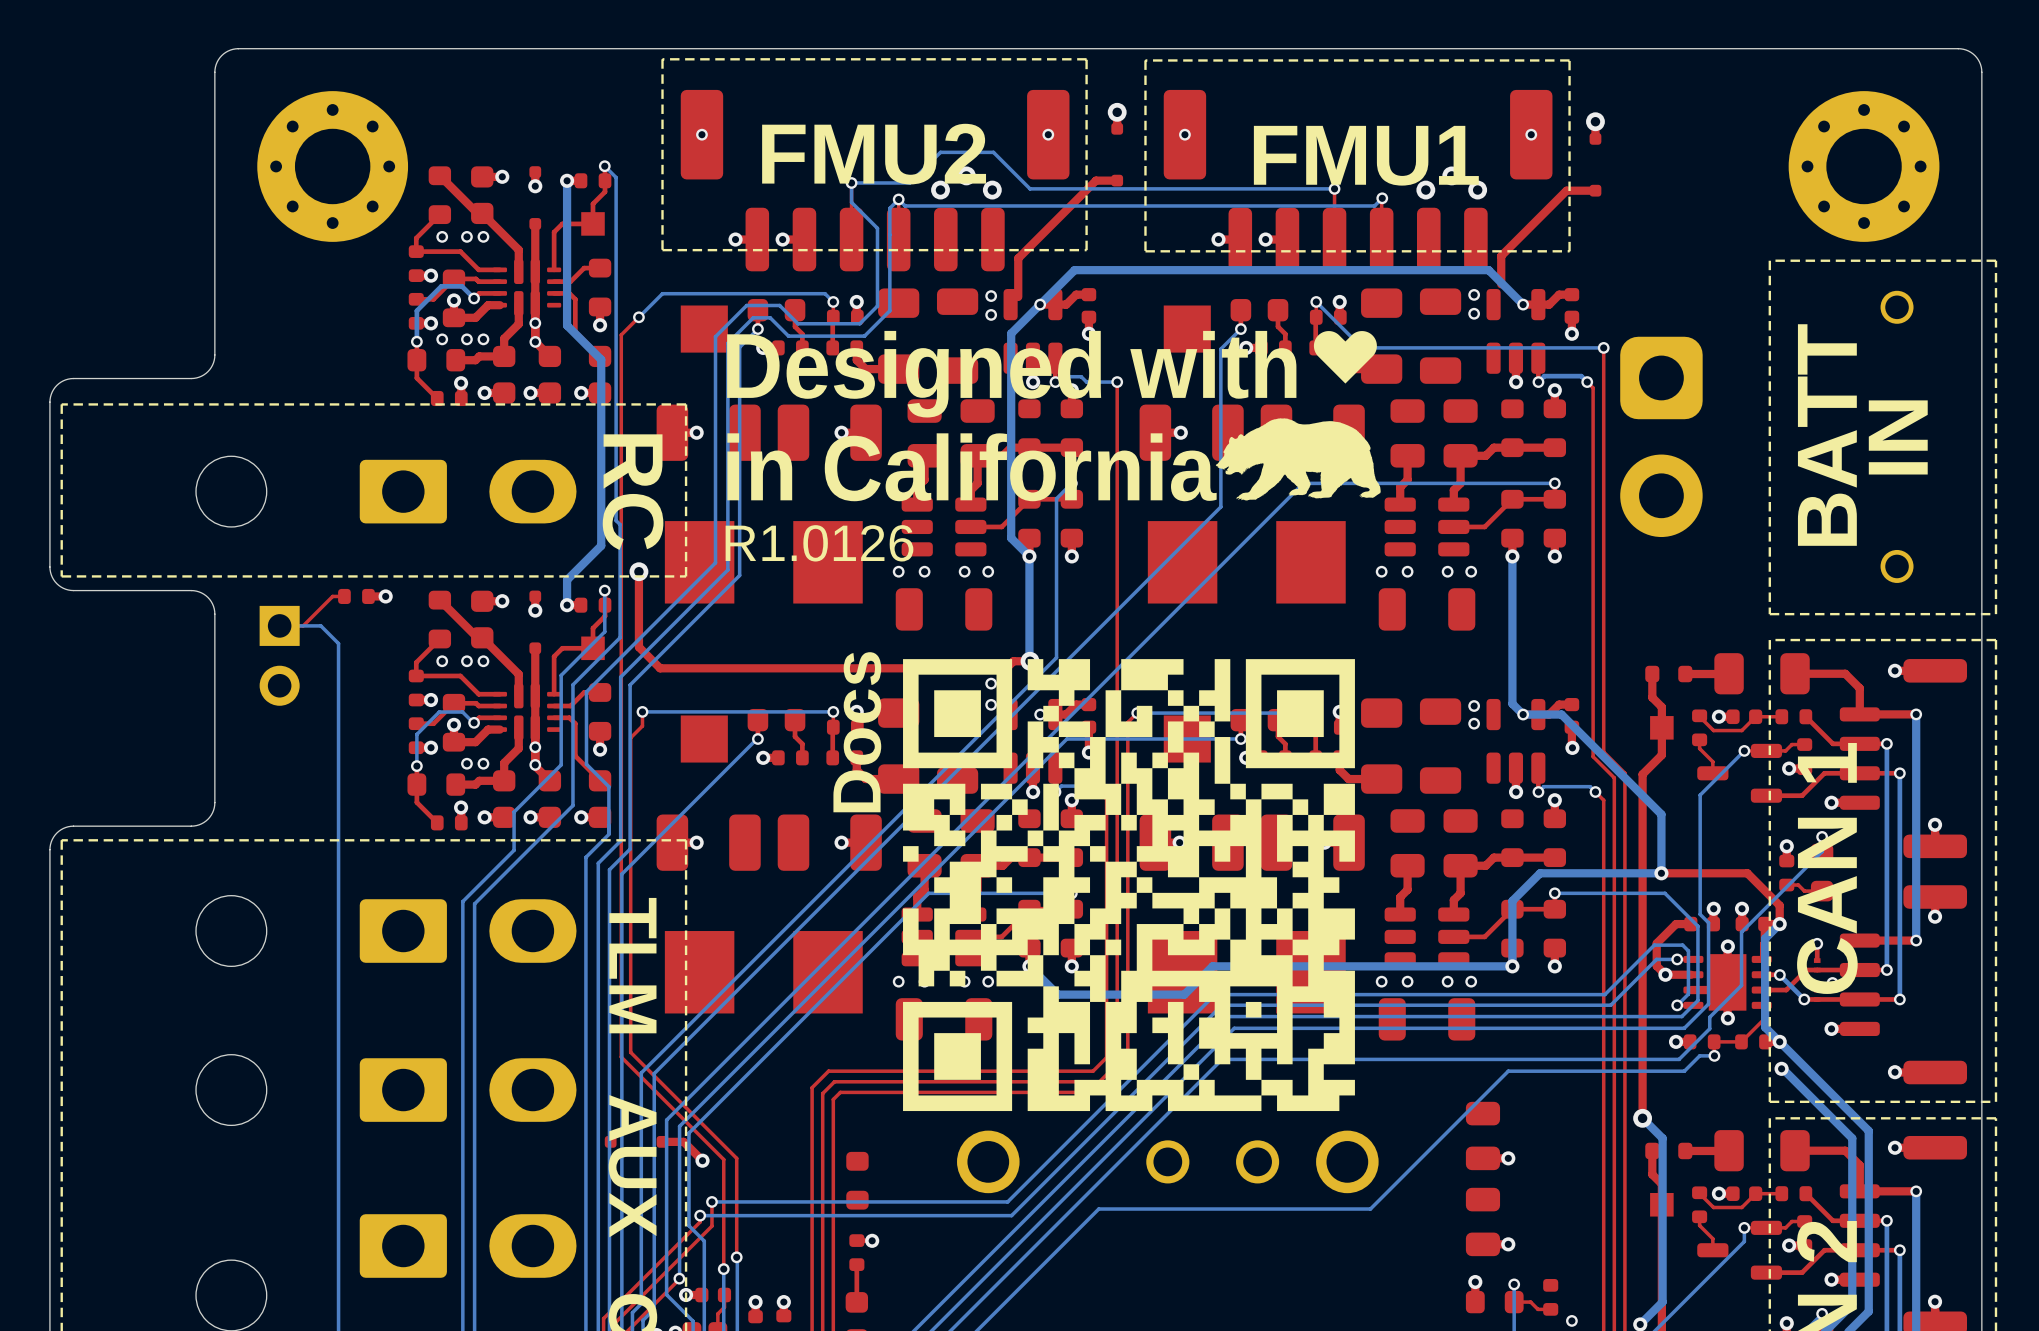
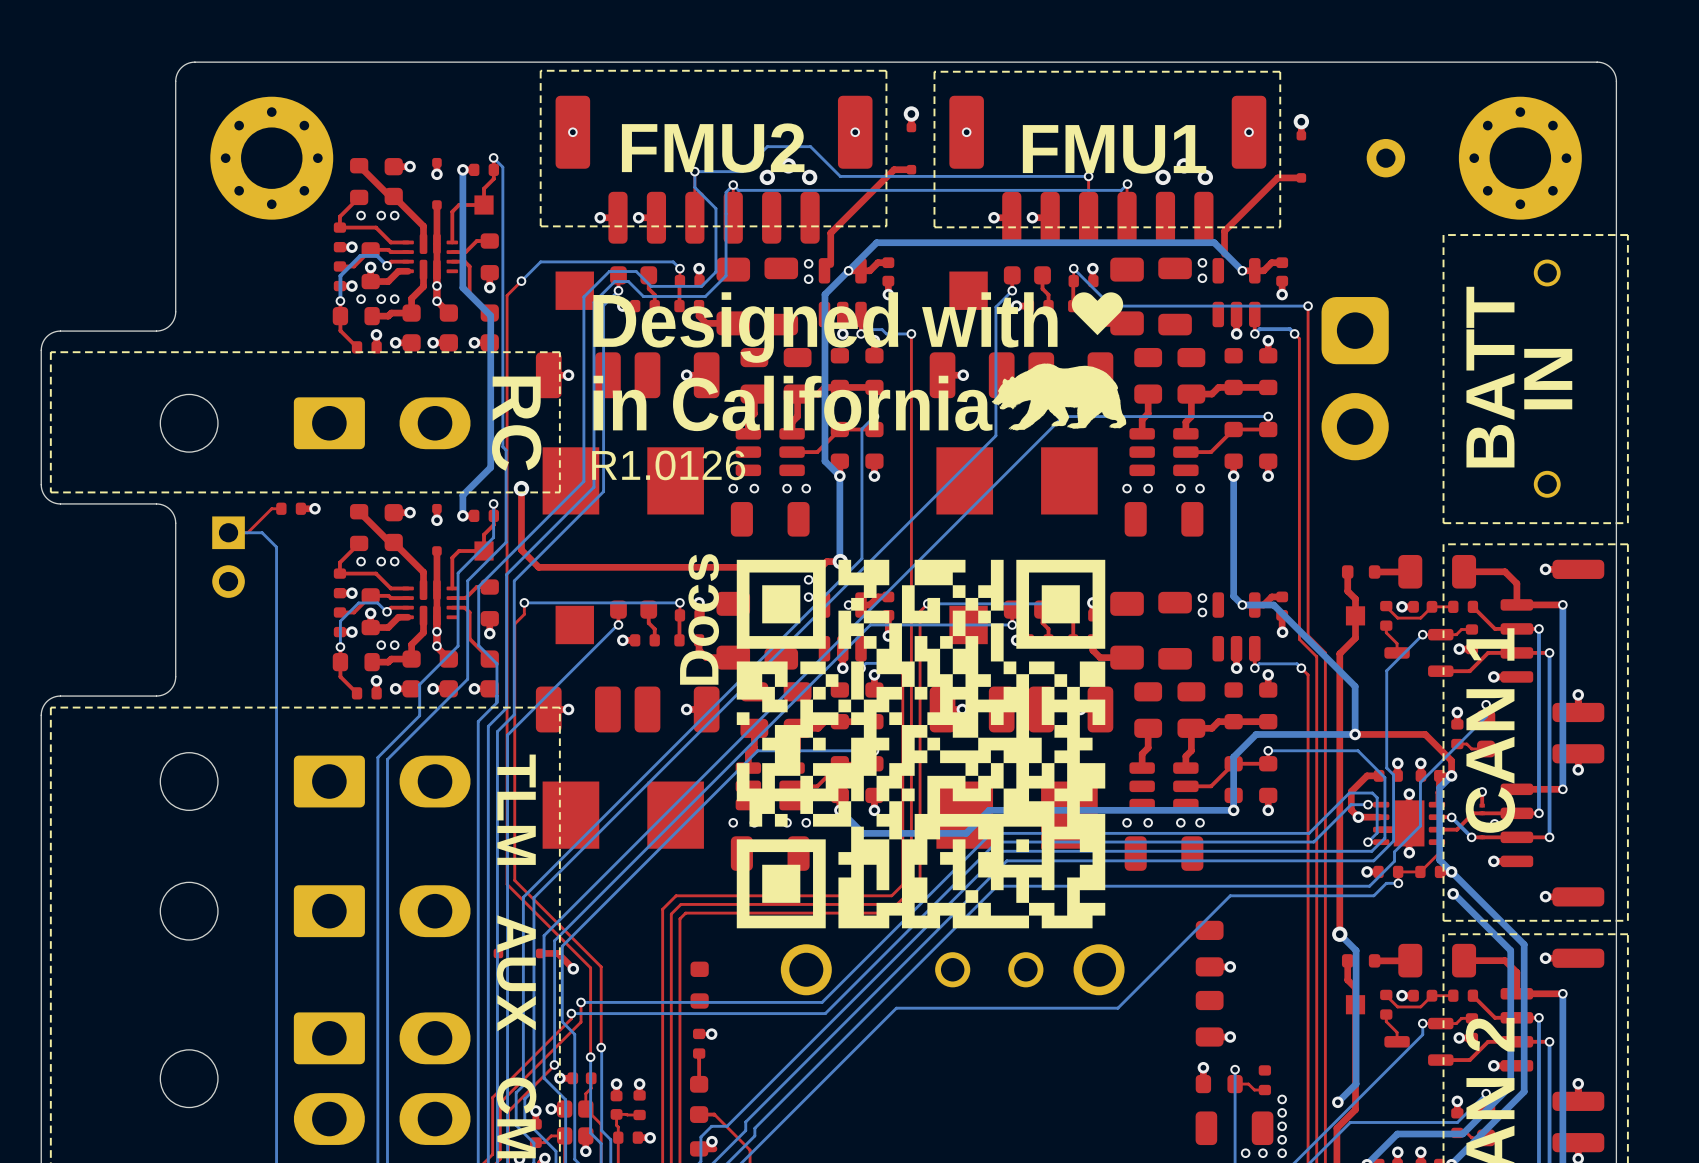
part: none -> (1385, 158)

